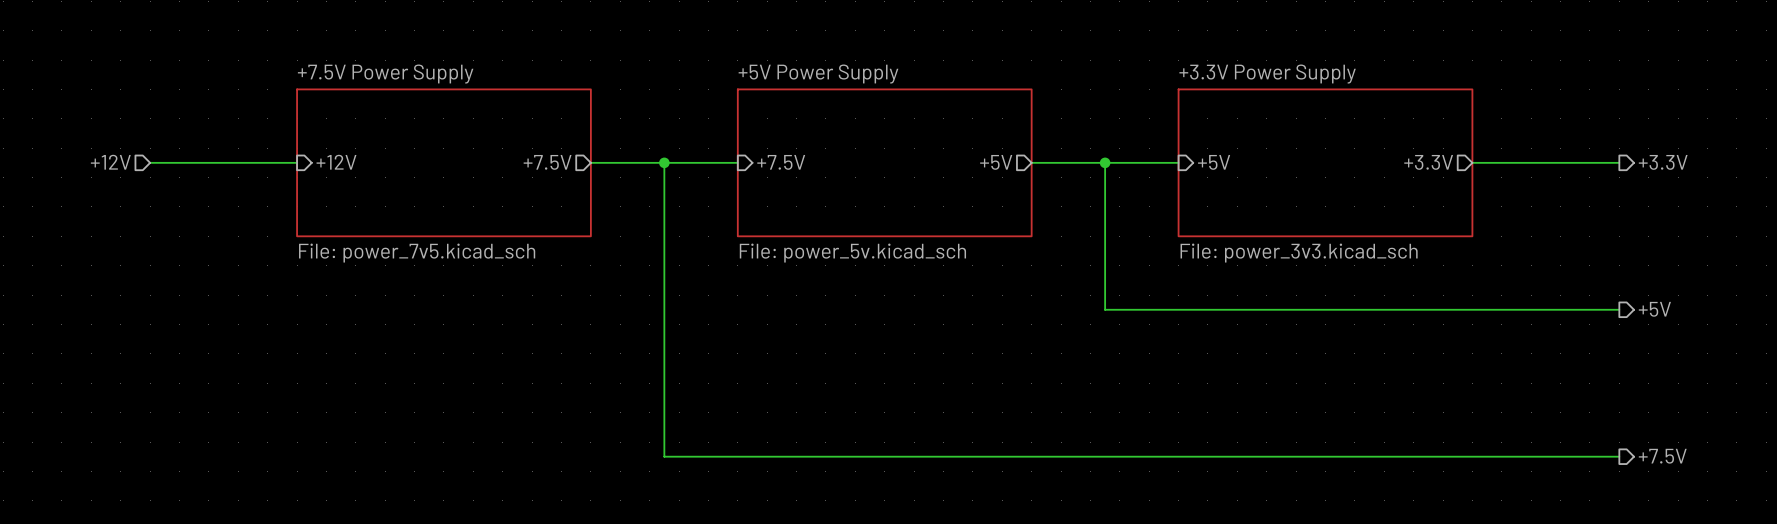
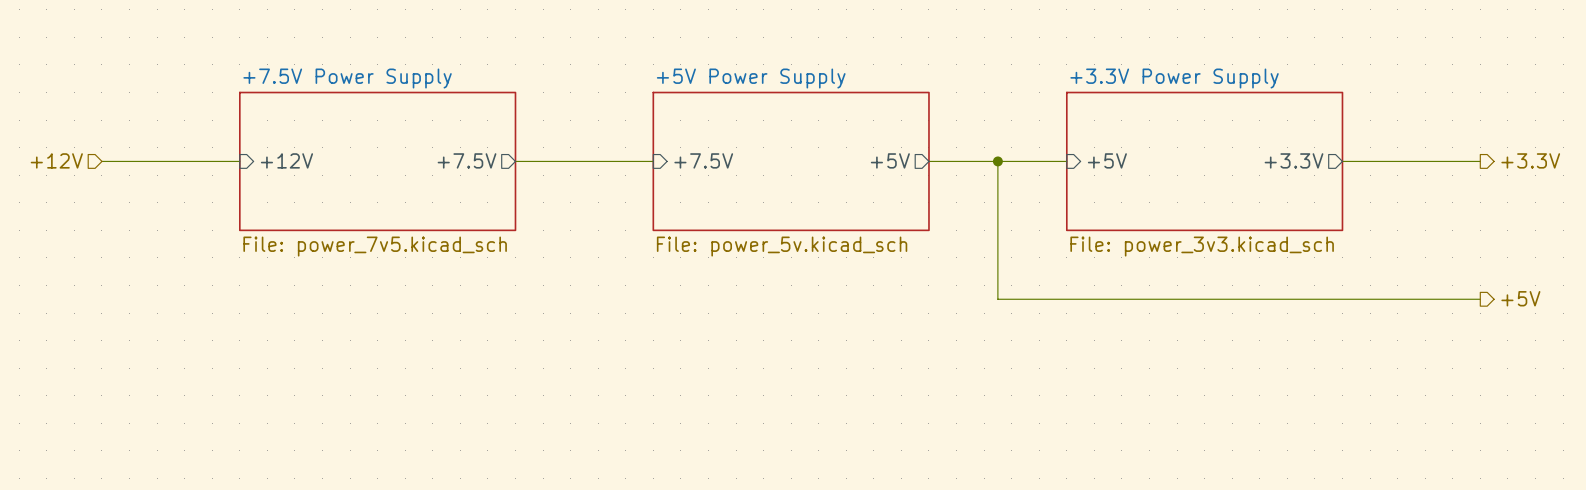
wire: (664, 162) (664, 456) (1619, 456) -> none
junction: (664, 162) -> none
hierarchical label: +7.5V (1662, 456) -> none

